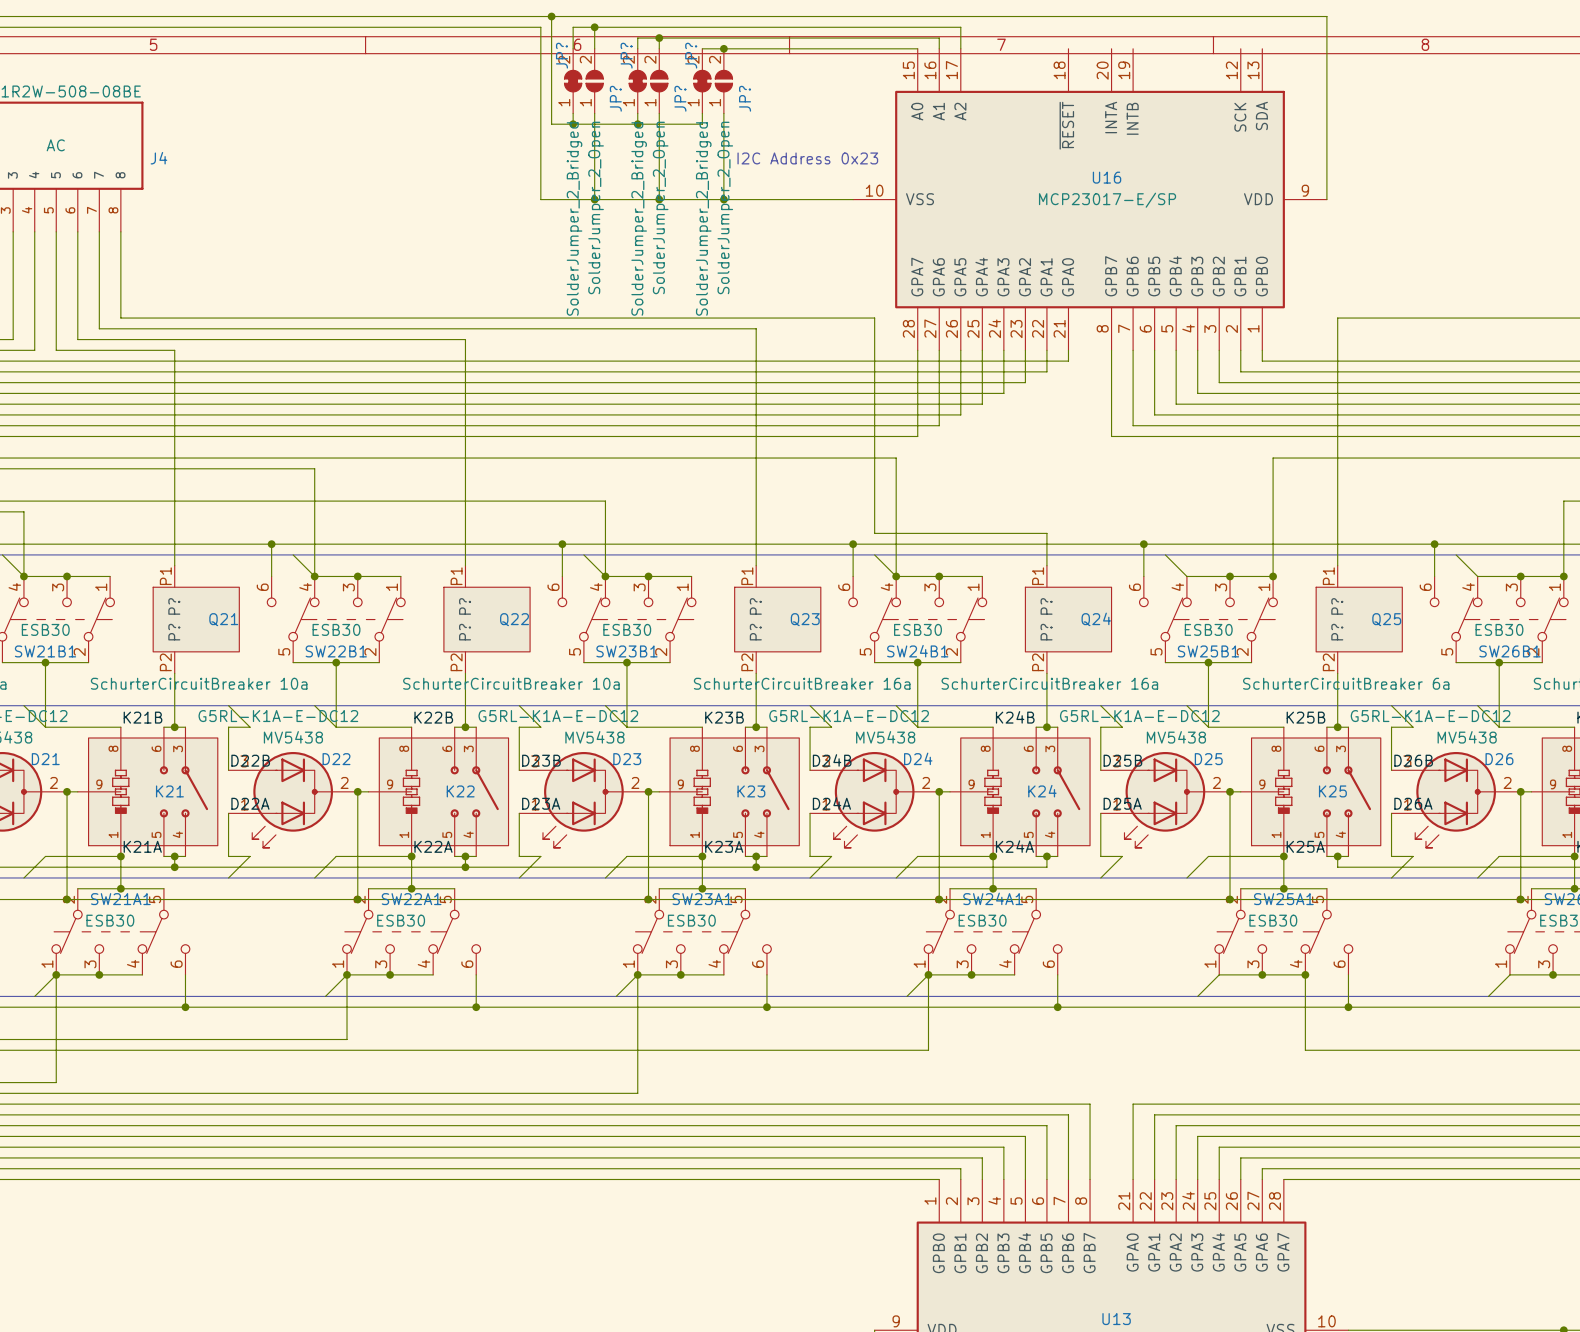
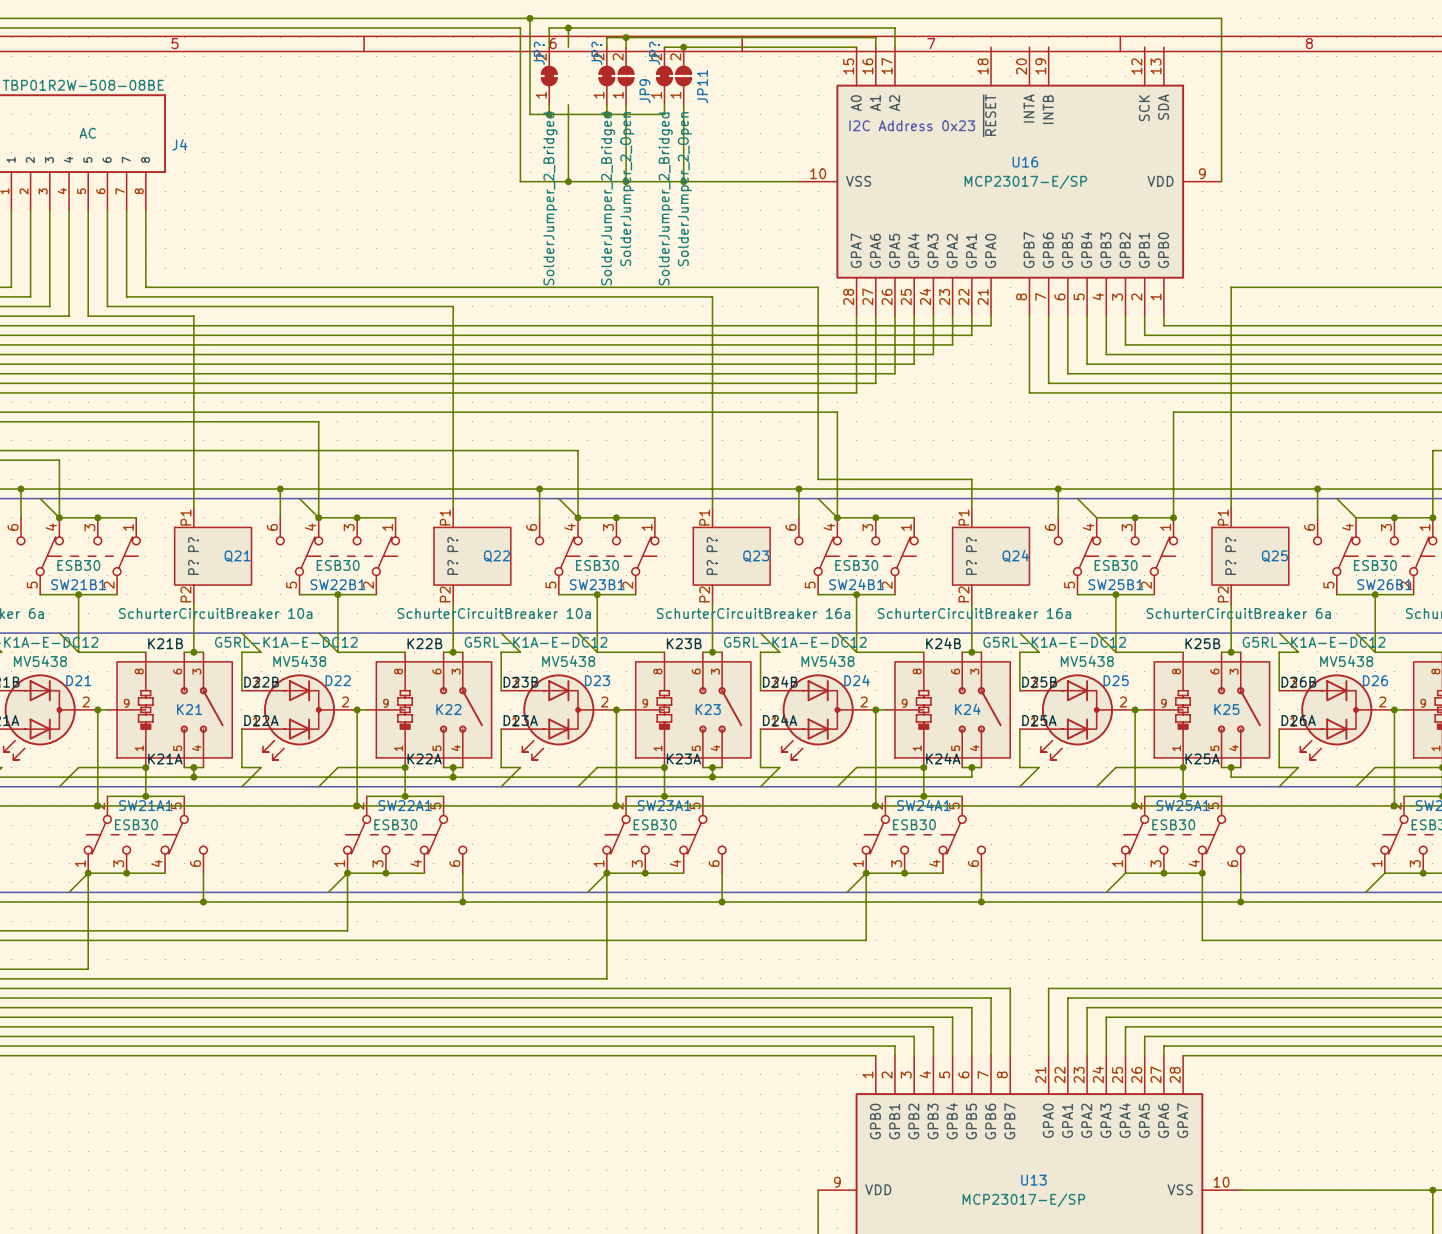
JP?: SolderJumper_2_Open (594, 81) -> none
JP? name: JP? (680, 98) -> JP9 (644, 91)
JP? name: JP? (745, 98) -> JP11 (702, 86)
text position: I2C Address 0x23 (807, 158) -> I2C Address 0x23 (912, 125)

